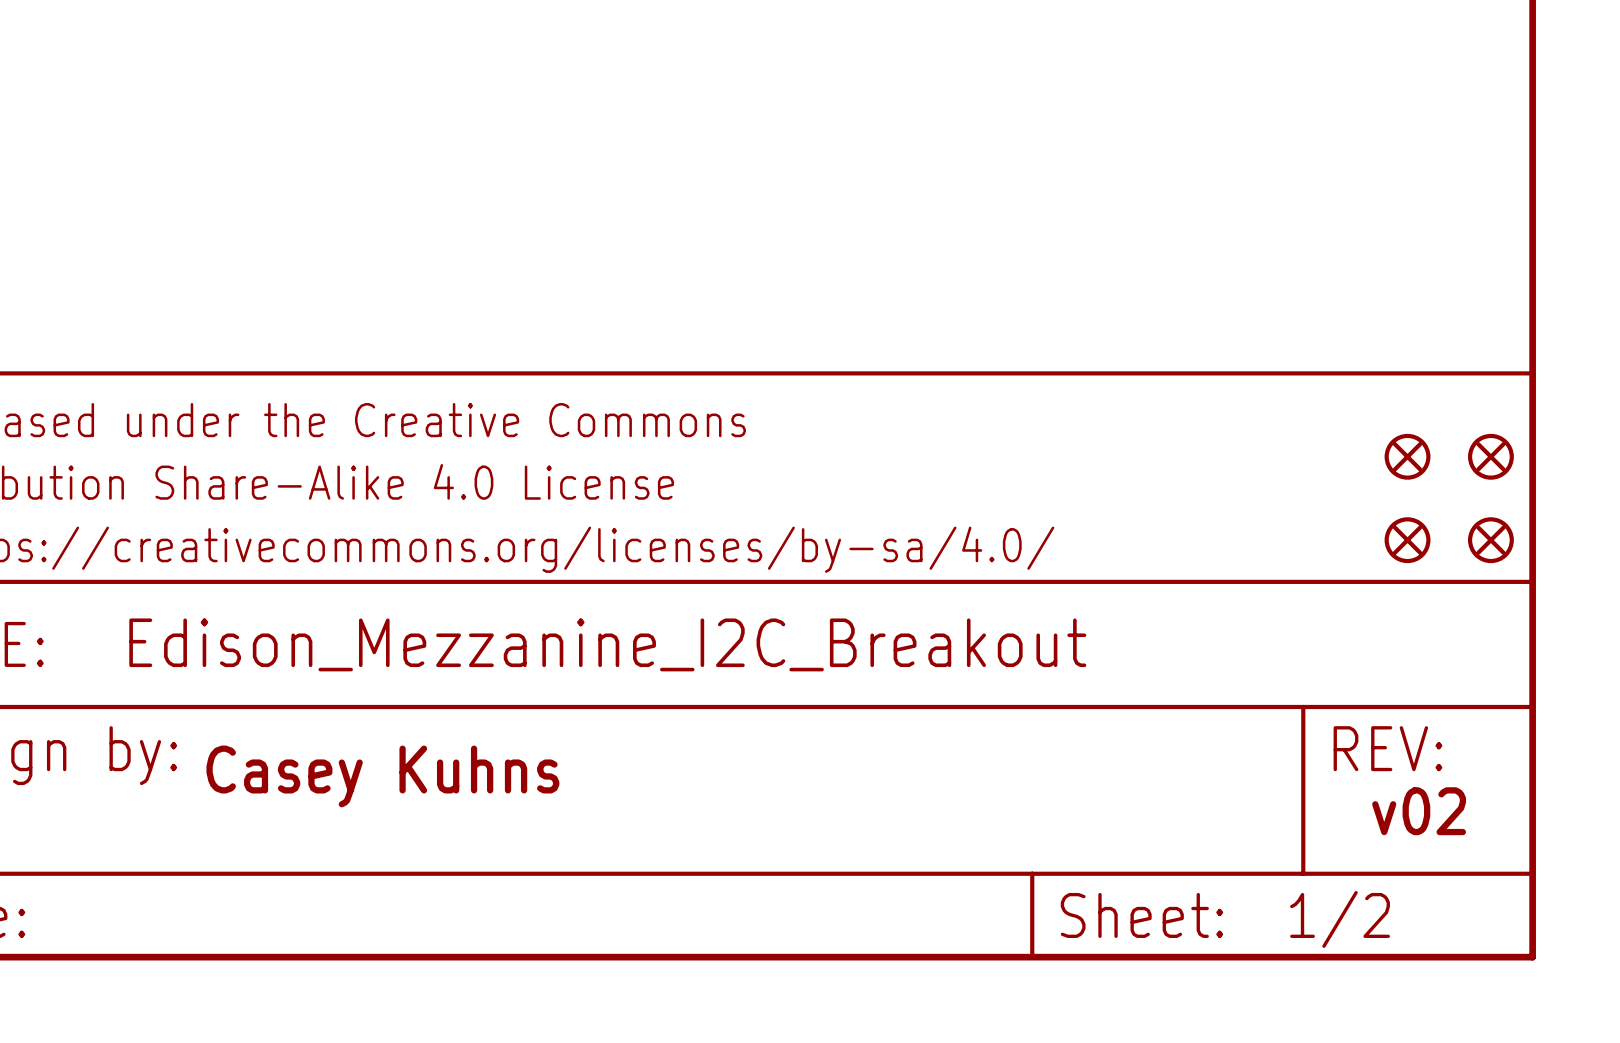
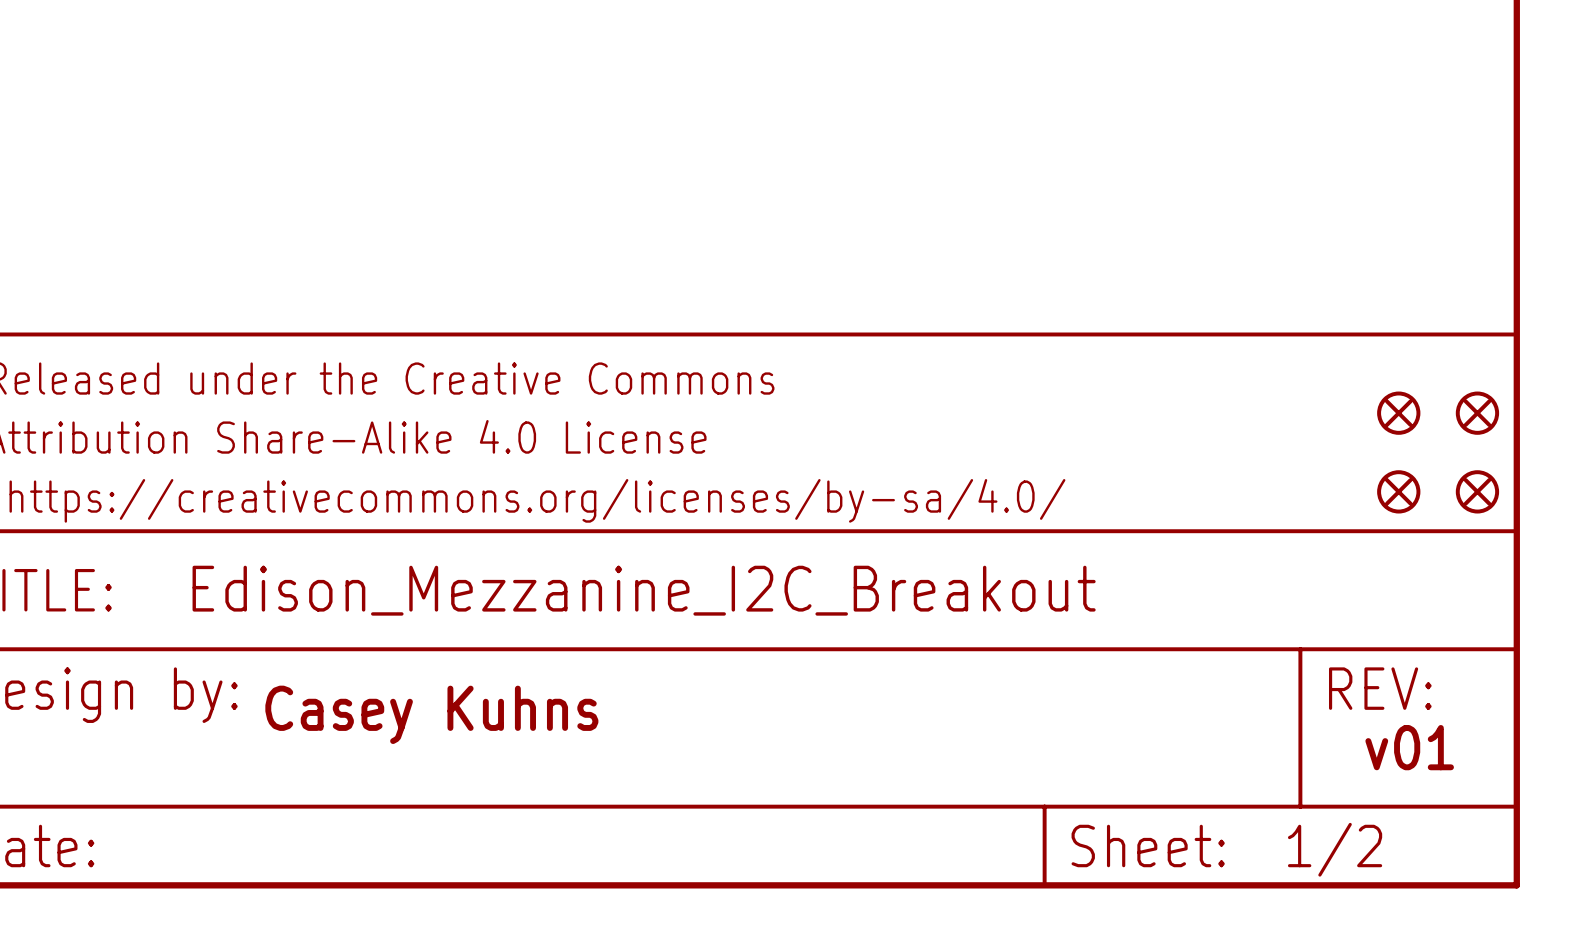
text: v02 (1419, 811) -> v01 (1409, 747)

